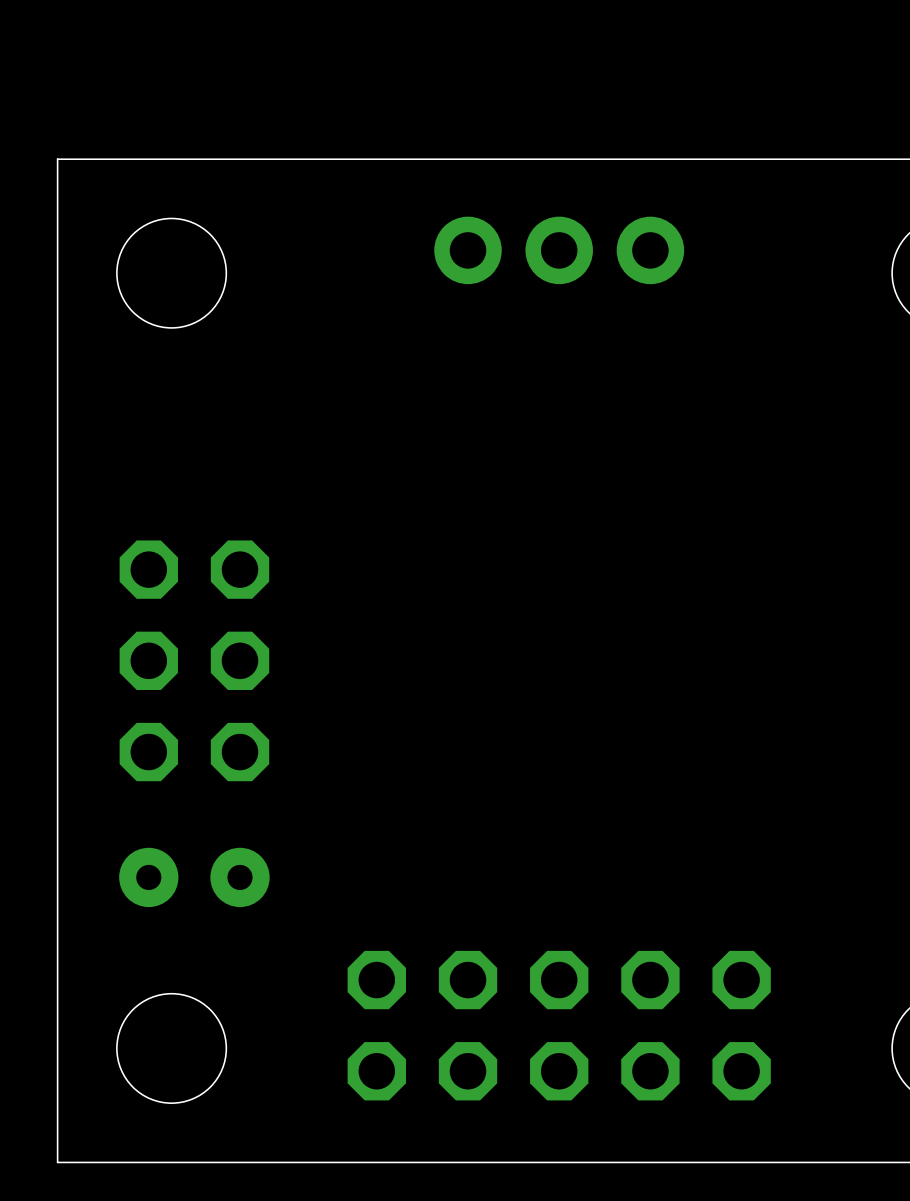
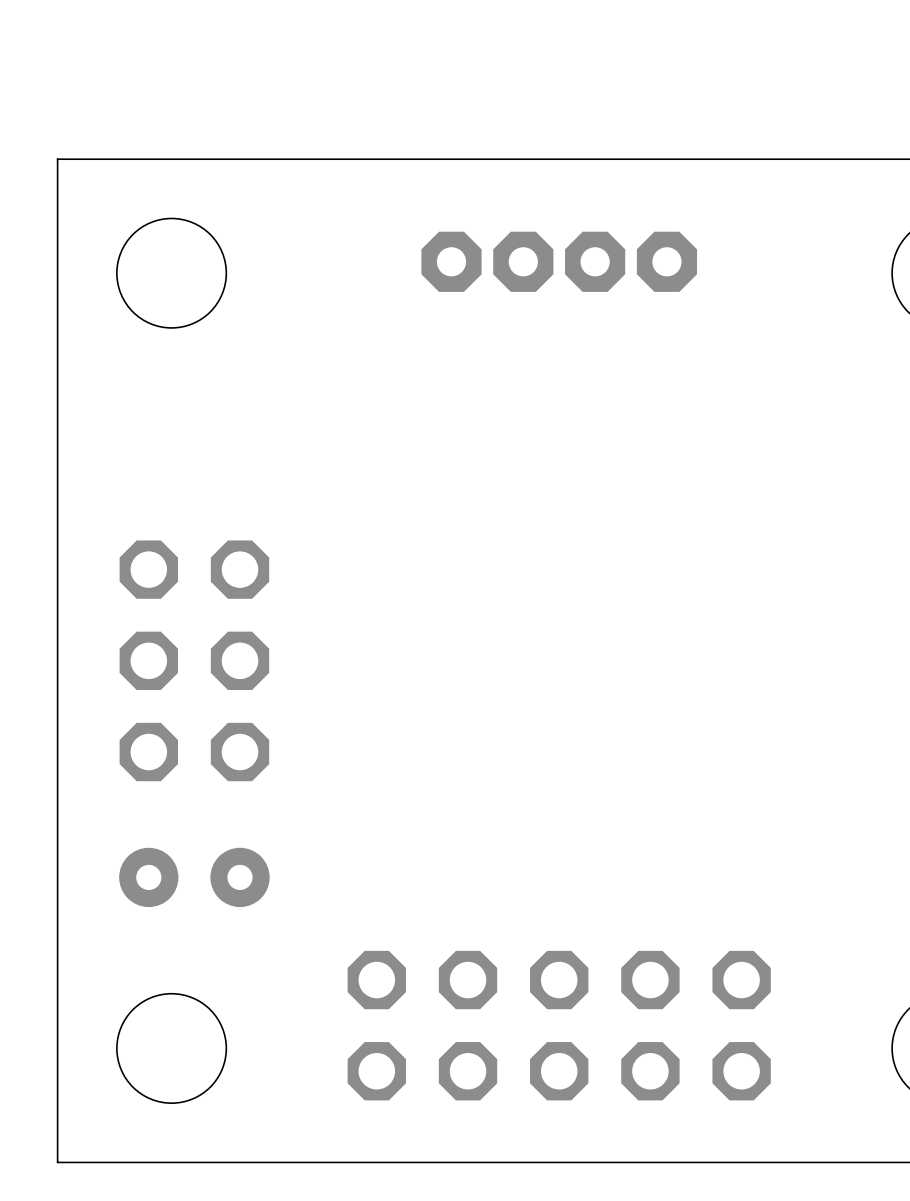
part footprint: [434, 216, 685, 285] -> [421, 231, 698, 292]

